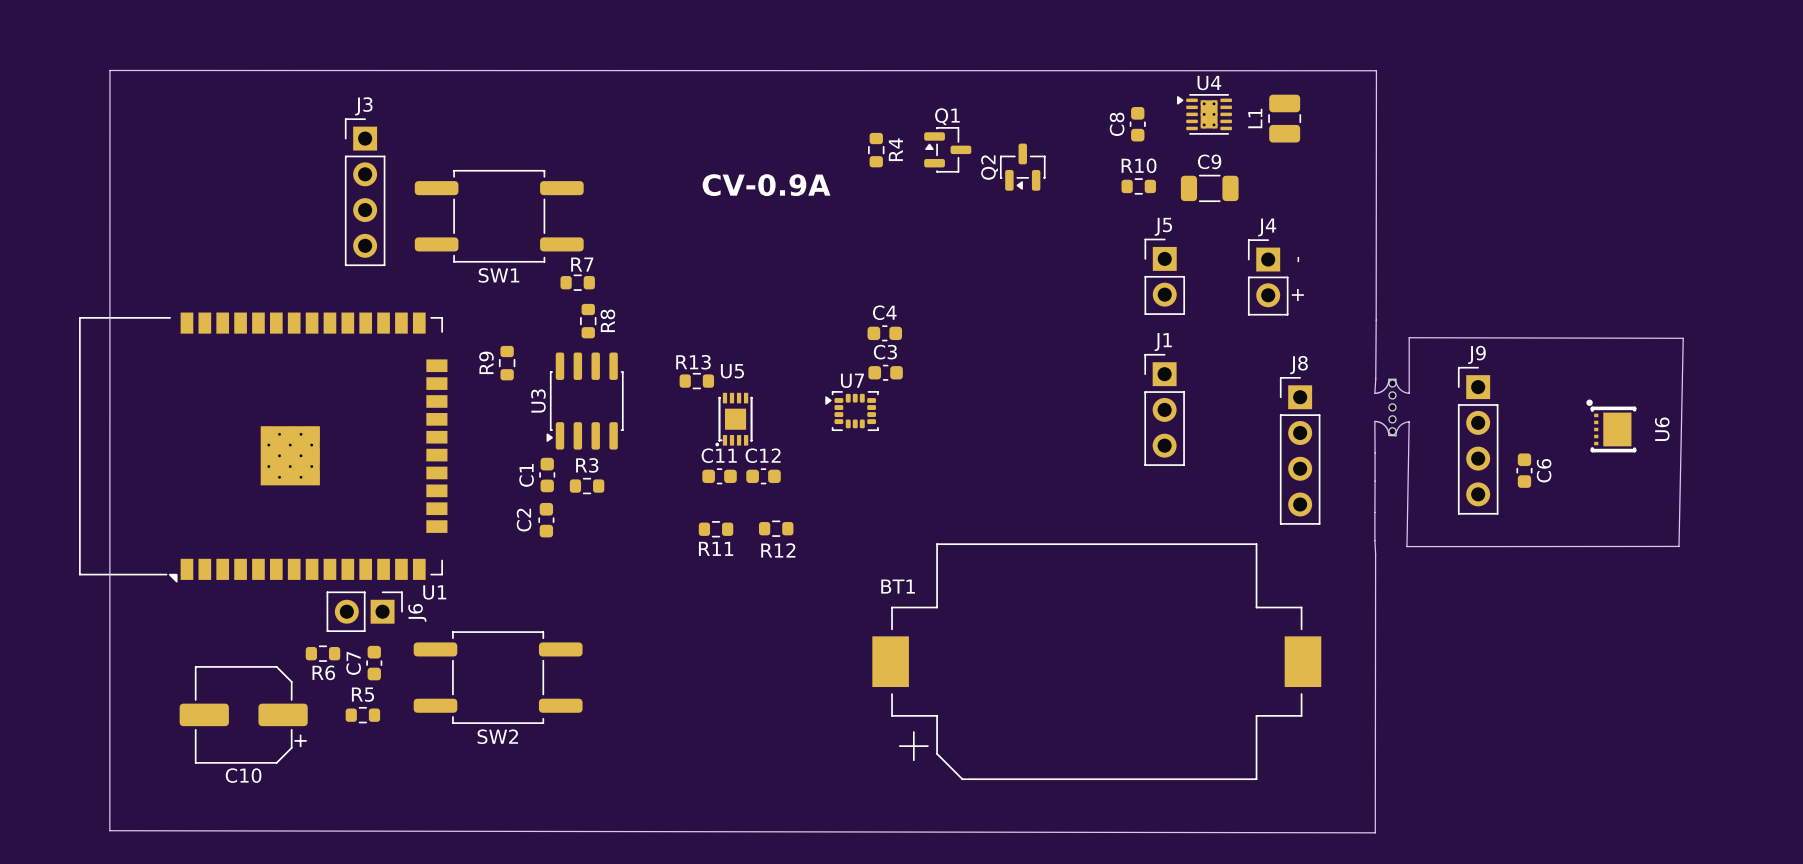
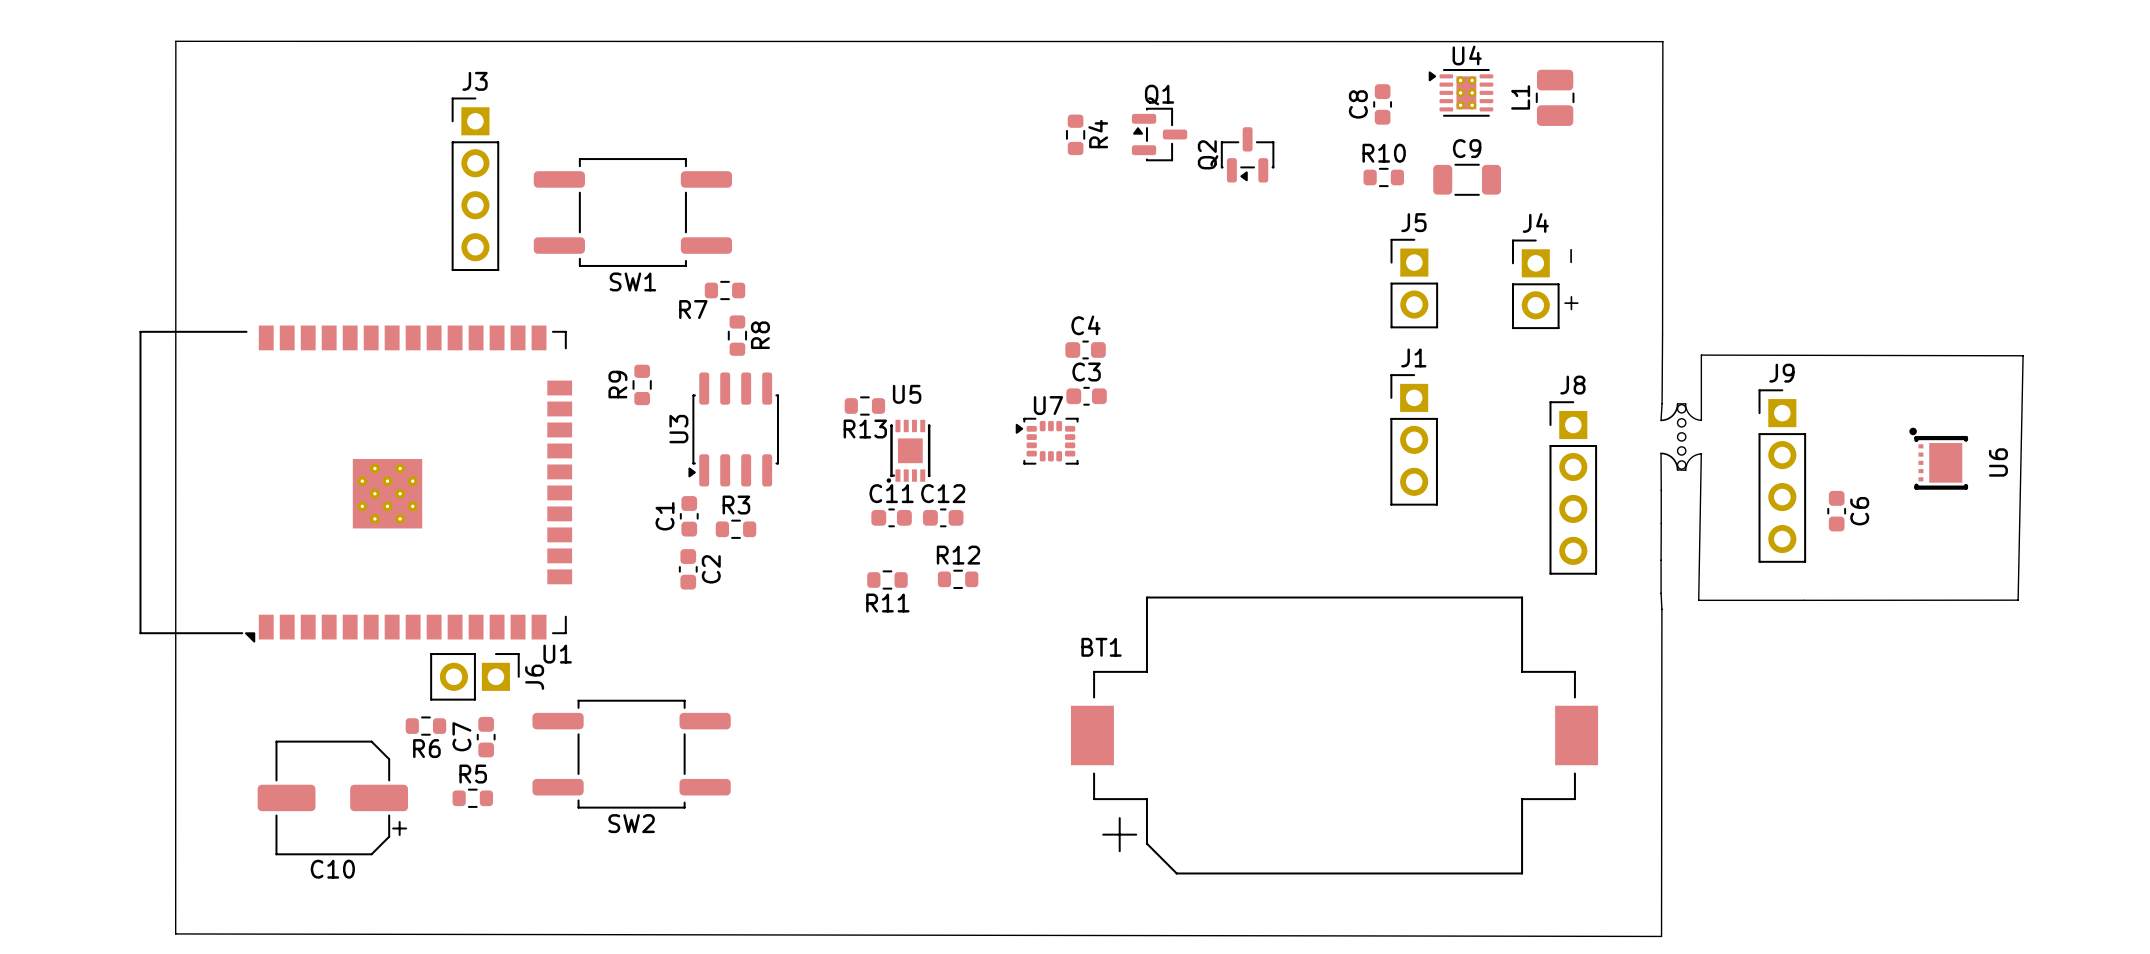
text: CV-0.9A (766, 185) -> none
R7 name position: R7 (582, 264) -> R7 (693, 309)
R13 name position: R13 (693, 362) -> R13 (865, 429)
C2 name position: C2 (524, 520) -> C2 (711, 569)
R12 name position: R12 (778, 550) -> R12 (958, 555)

